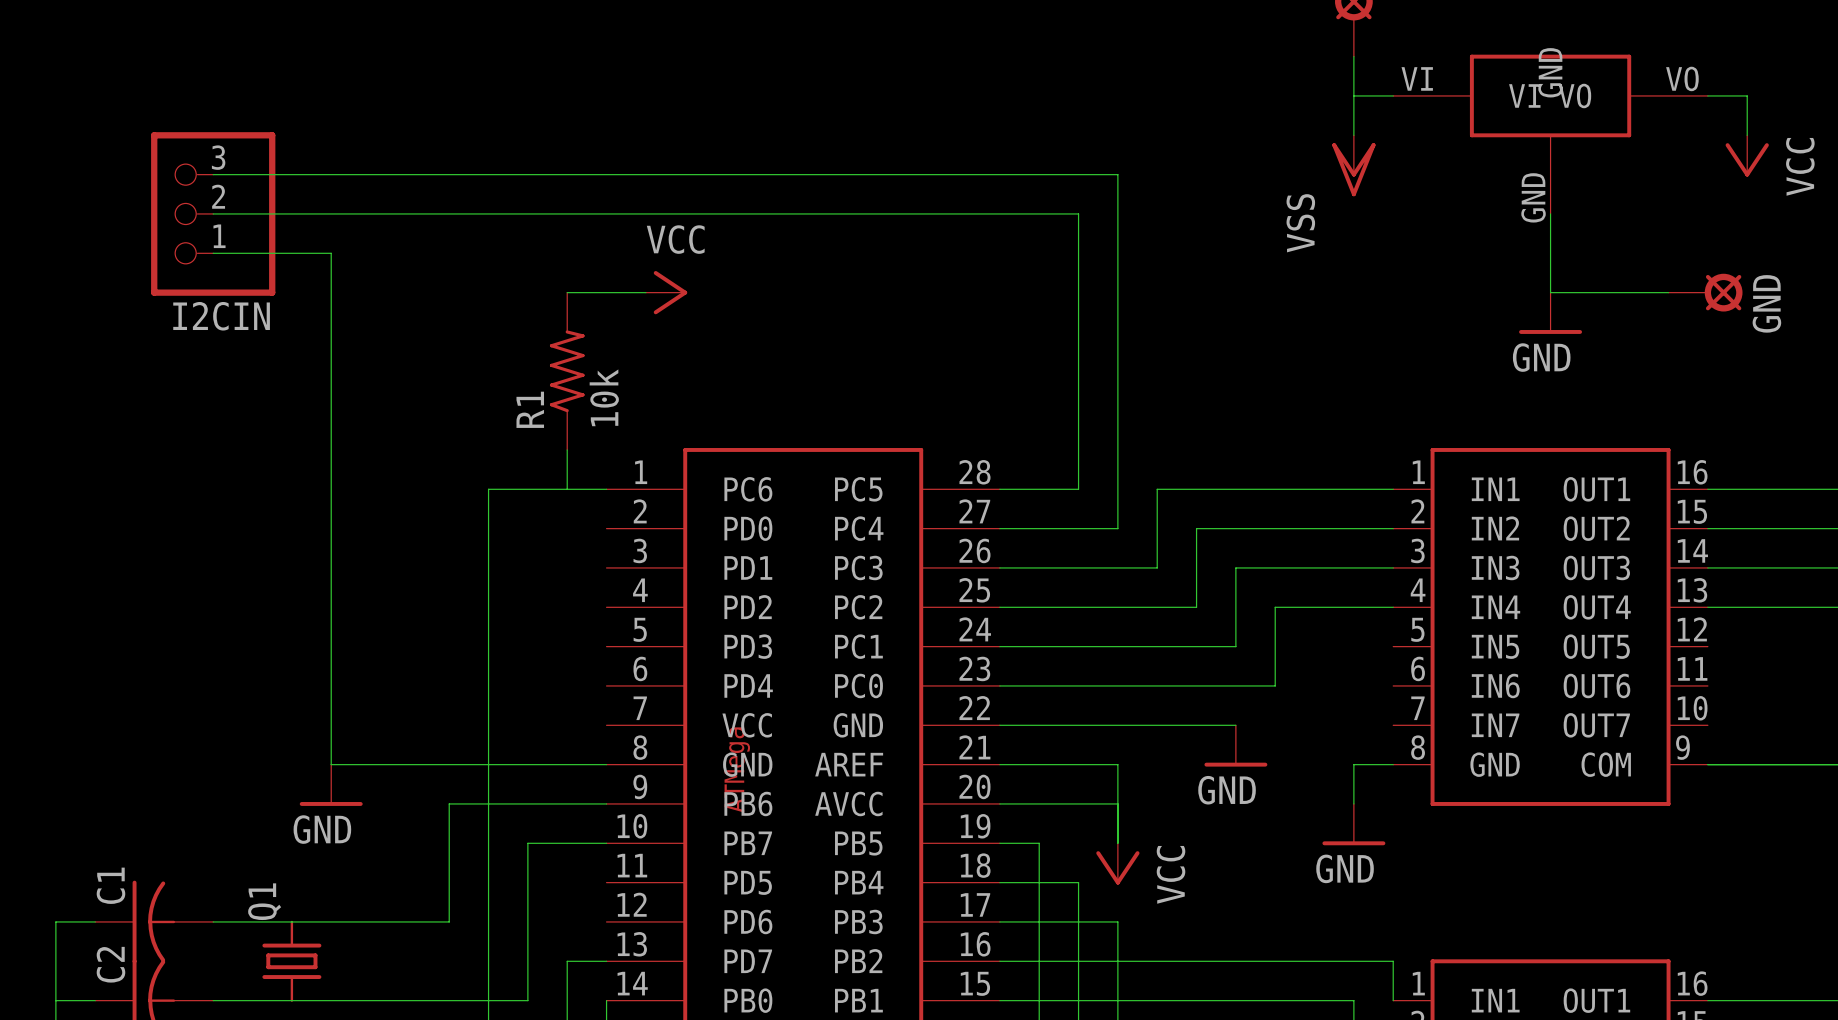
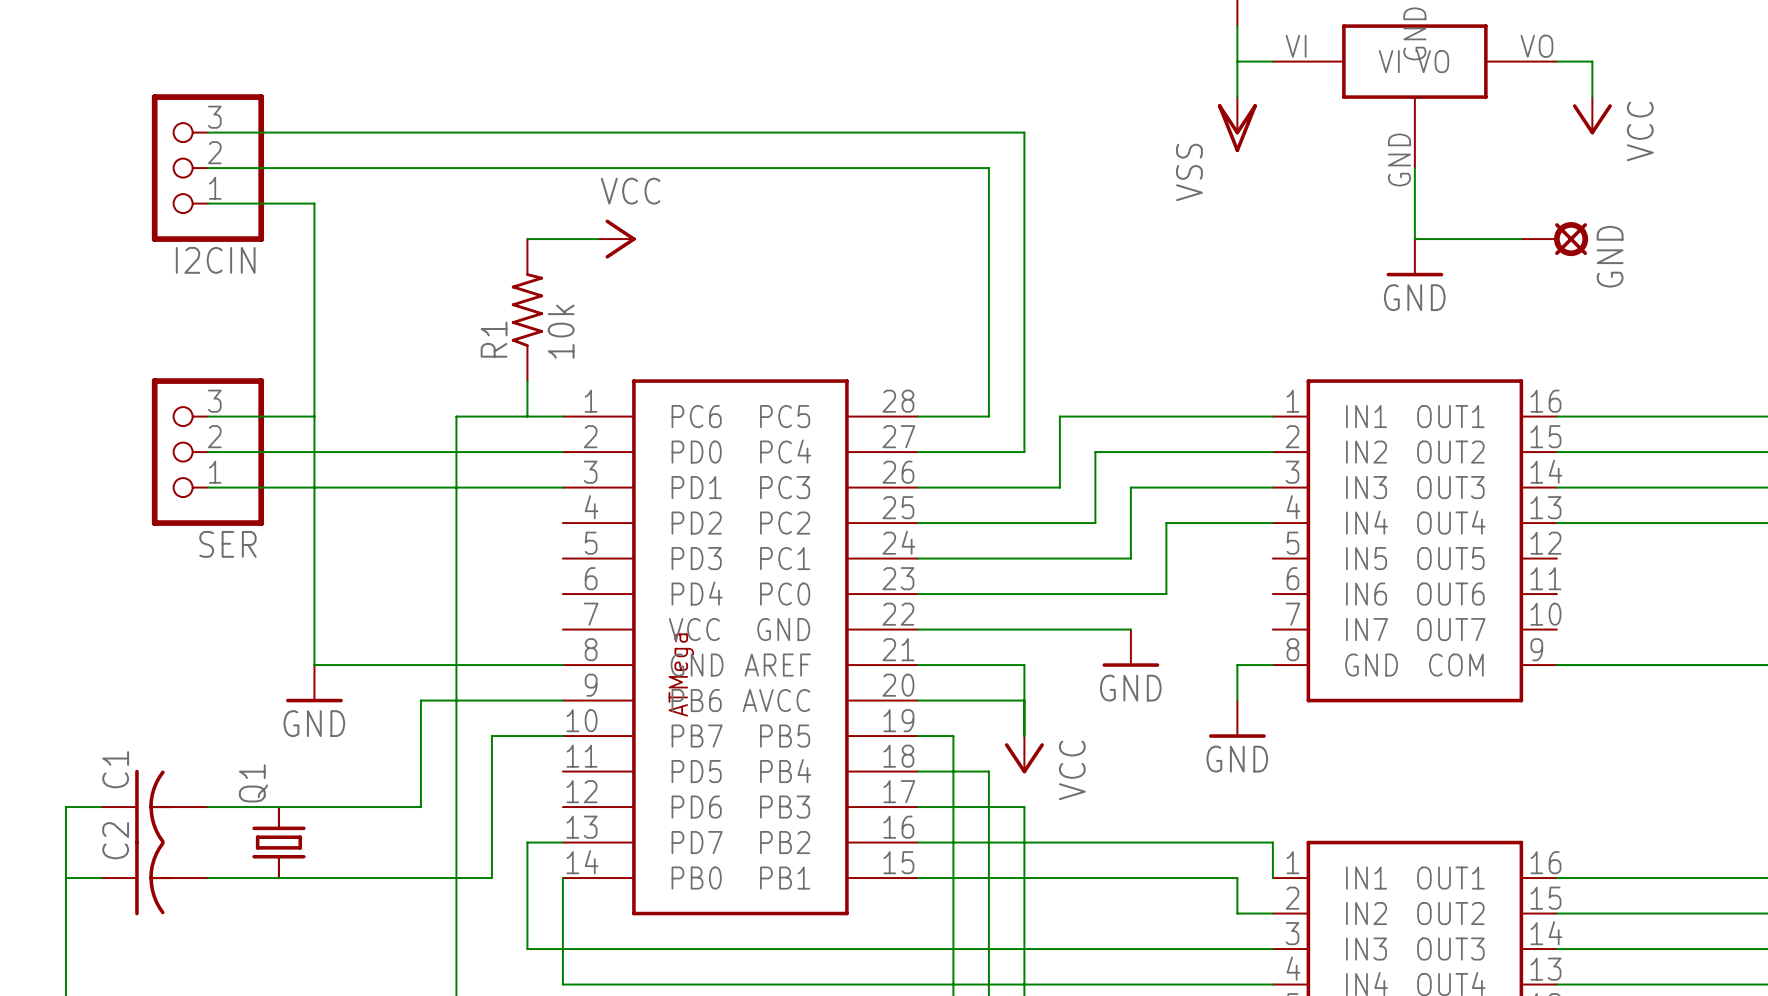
wire: none -> (207, 416) (314, 416)
wire: none -> (207, 452) (562, 452)
SER: none -> (207, 452)
wire: none -> (207, 487) (562, 487)

